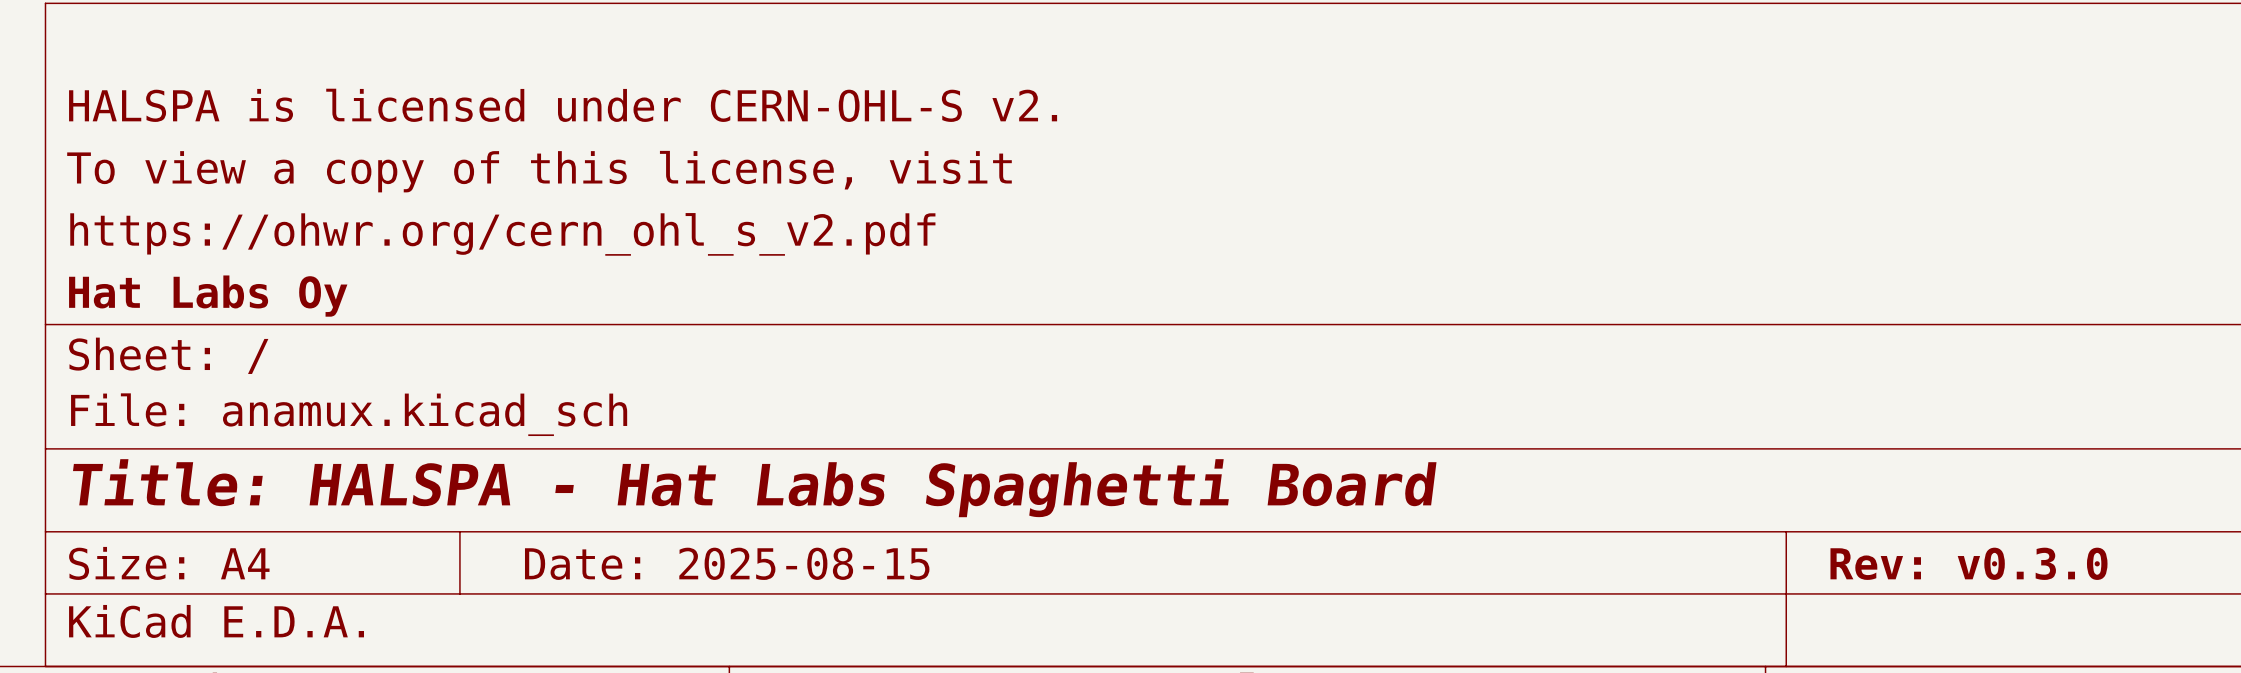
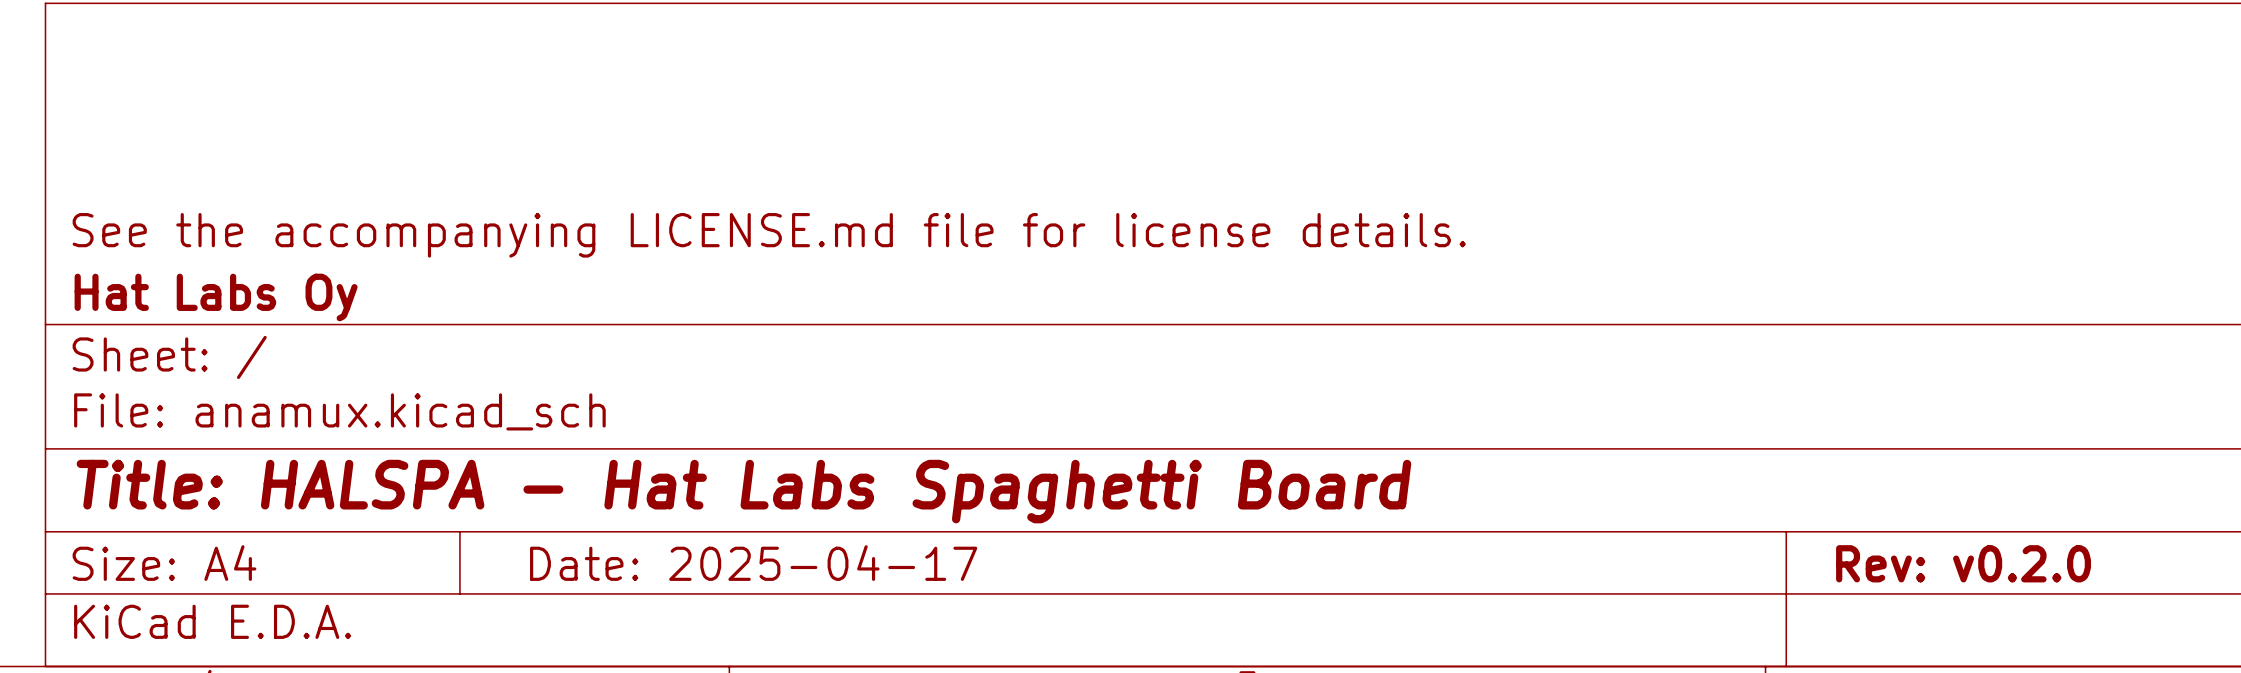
title block: HALSPA is licensed under CERN-OHL-S v2. (563, 105) -> none
title block: To view a copy of this license, visit (539, 171) -> none
title block: https://ohwr.org/cern_ohl_s_v2.pdf (502, 234) -> See the accompanying LICENSE.md file for license details. (769, 235)
title block: Date: 2025-08-15 (727, 563) -> Date: 2025-04-17 (753, 563)
title block: Rev: v0.3.0 (1968, 563) -> Rev: v0.2.0 (1963, 563)

